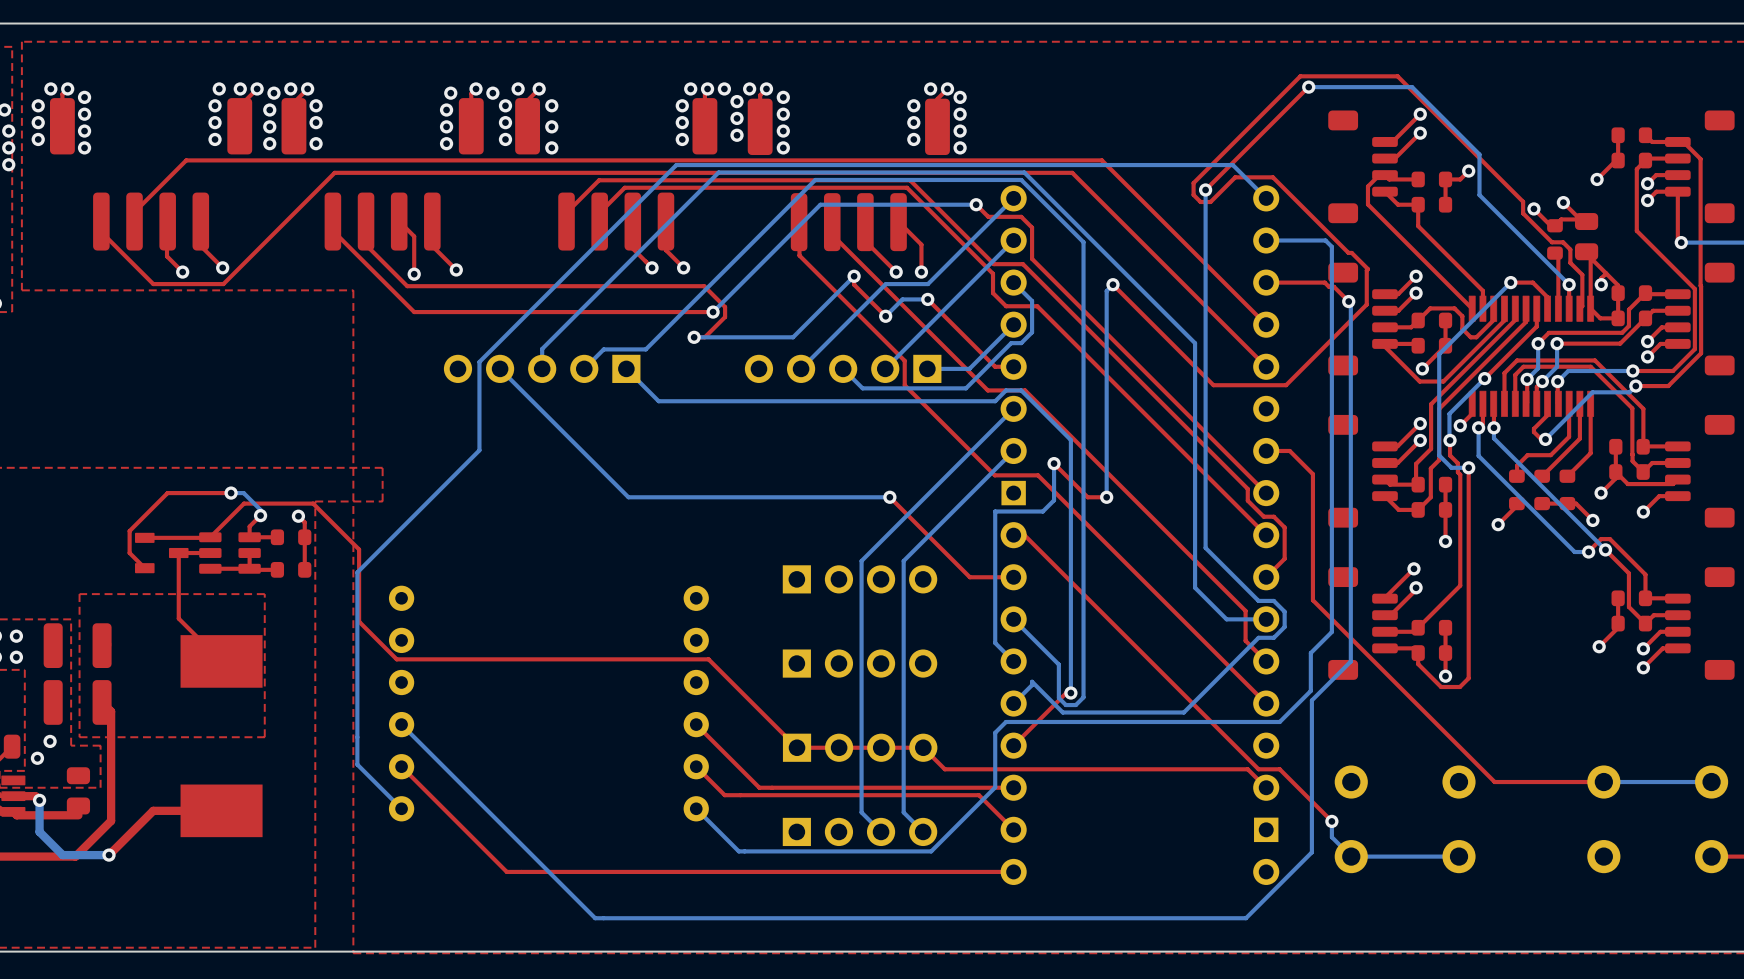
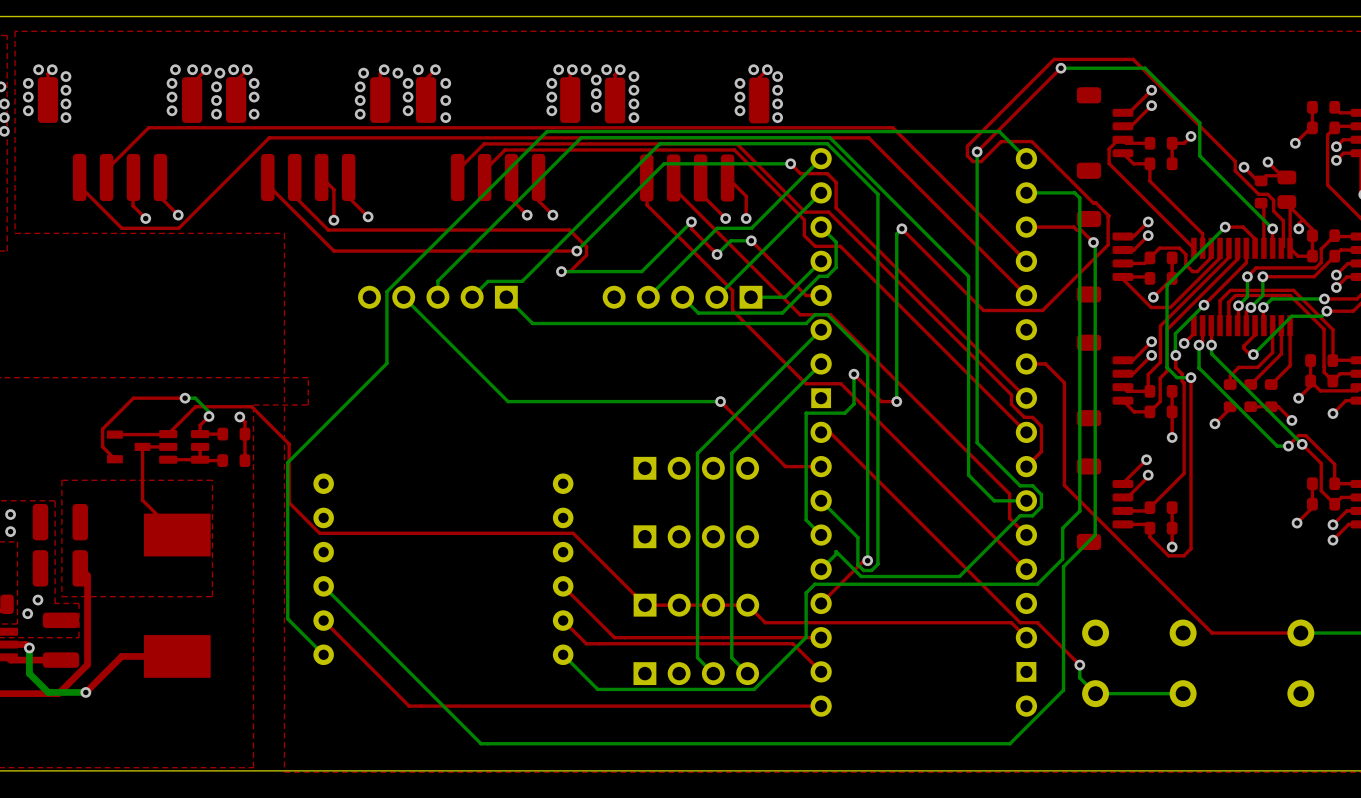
part footprint: [66, 767, 91, 815] -> [42, 612, 80, 668]

